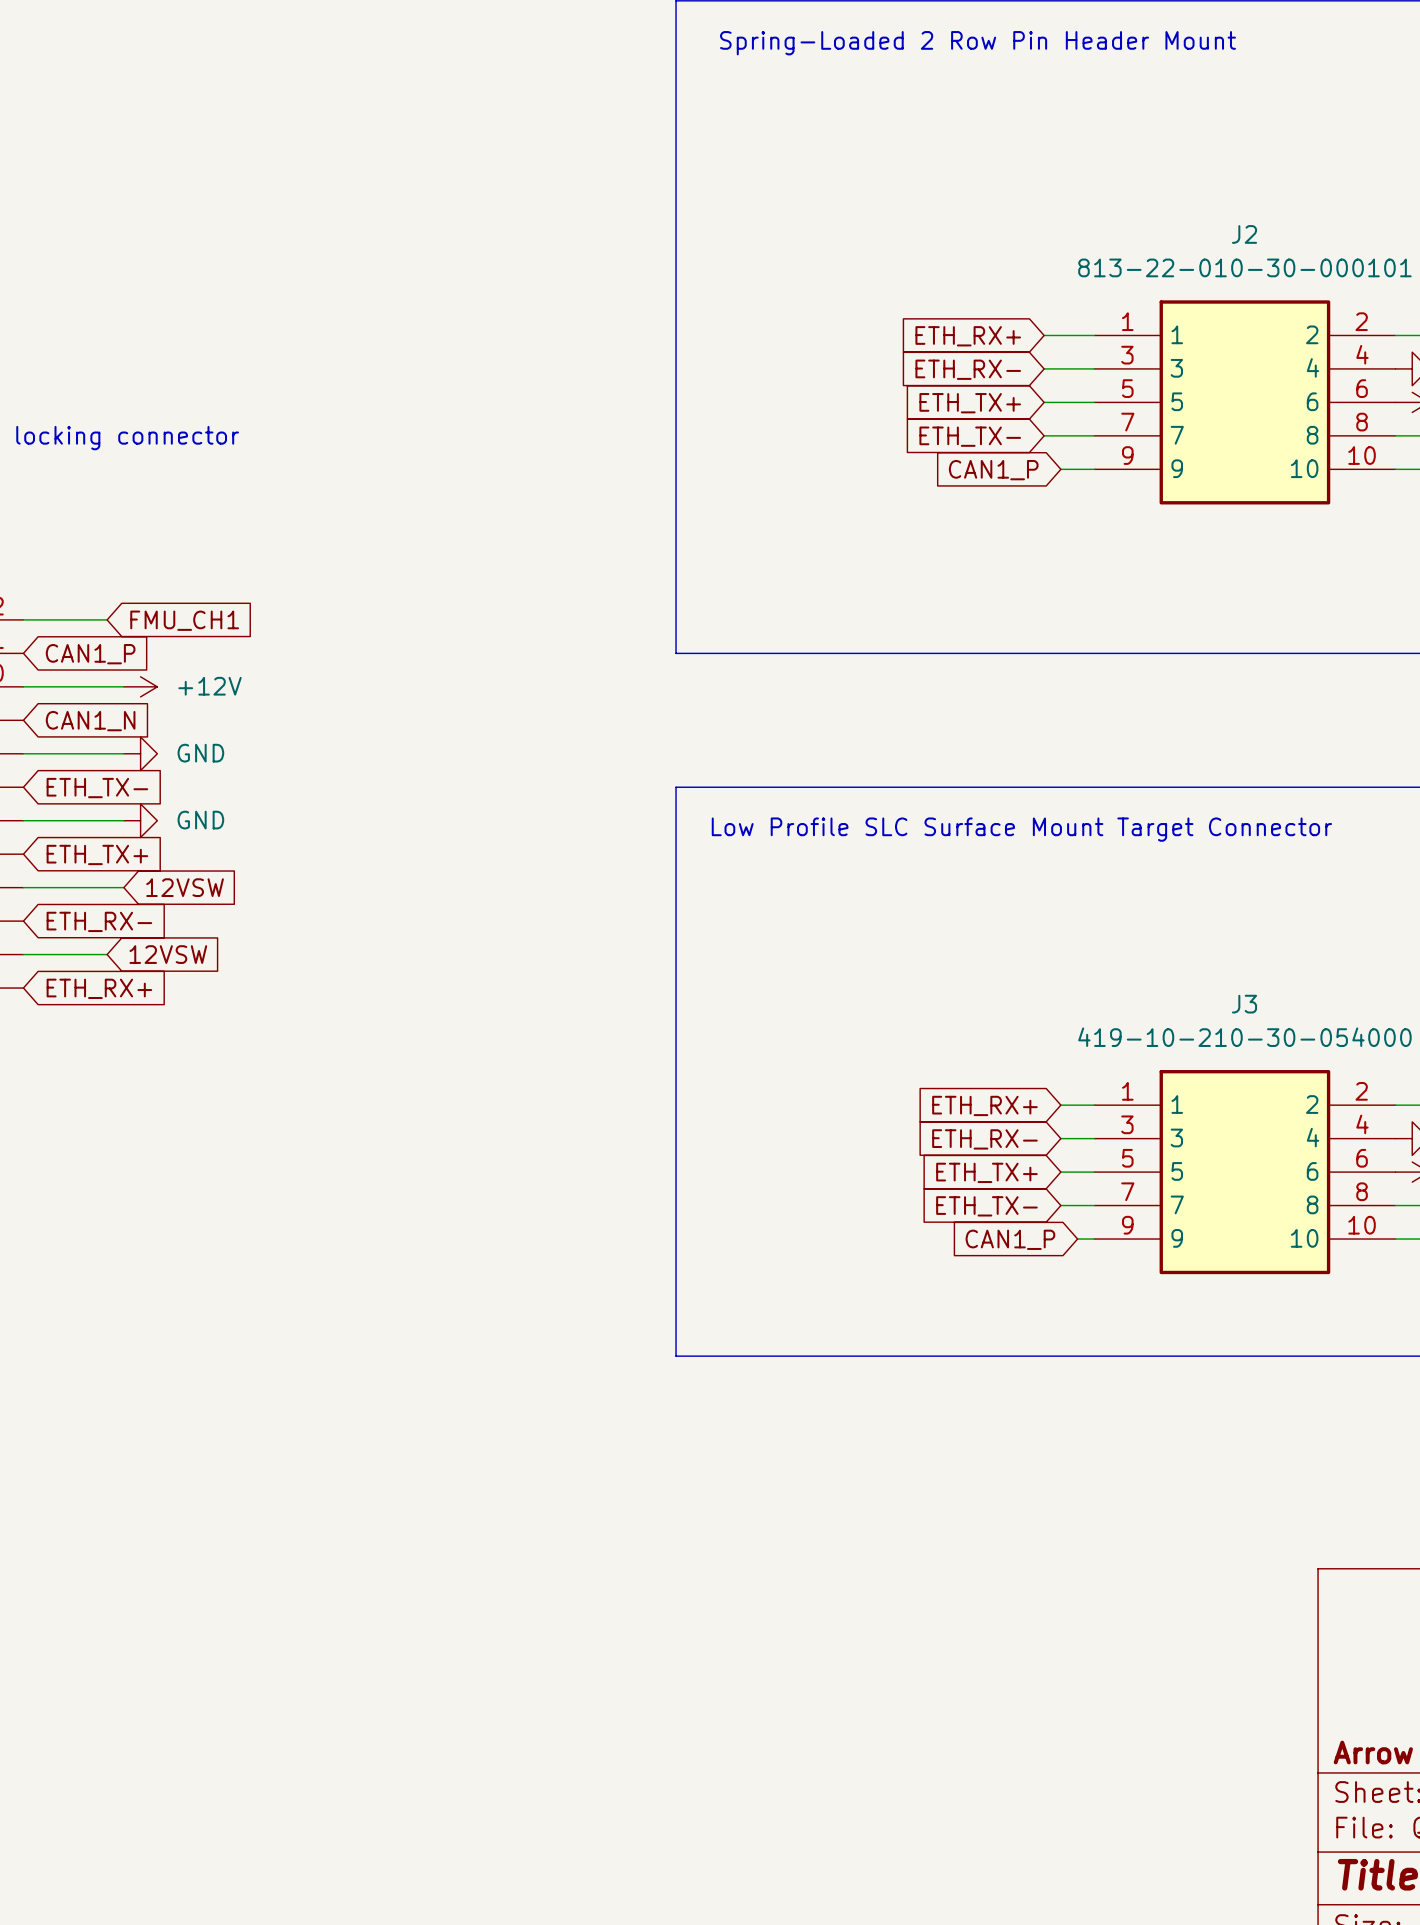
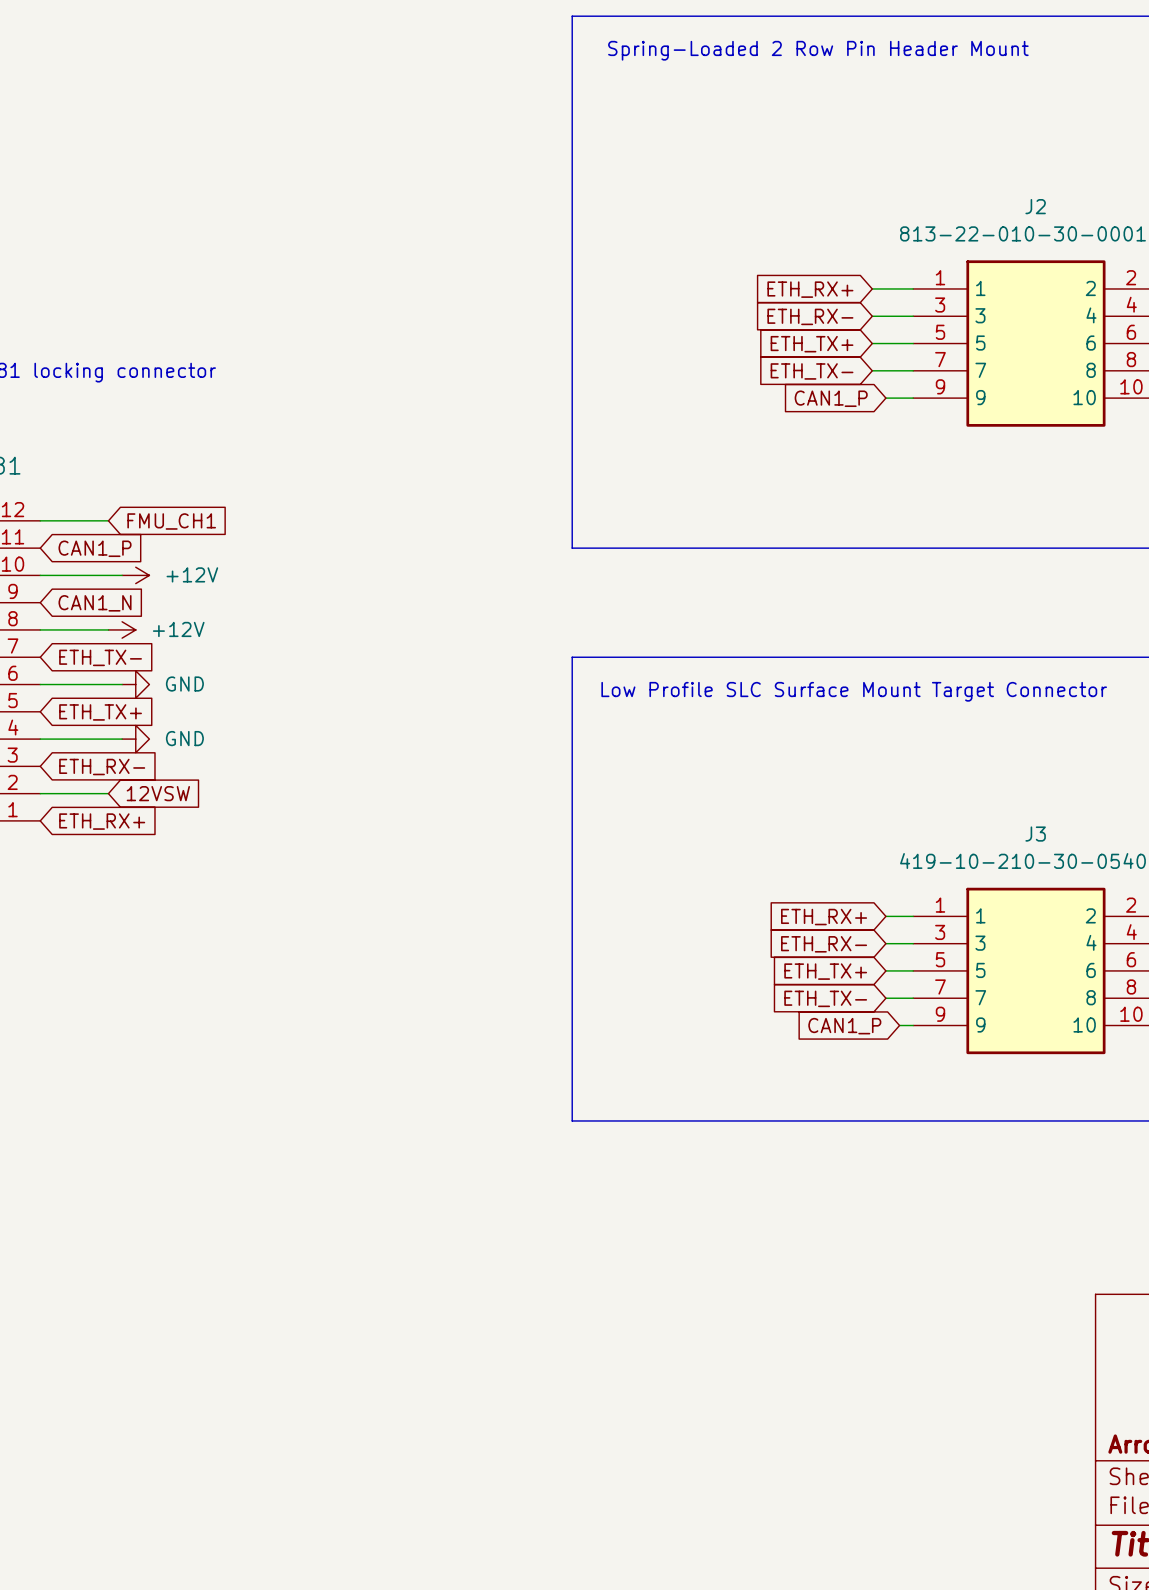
power symbol: none -> +12V (122, 629)
power symbol position: GND (140, 753) -> GND (135, 739)
global label: 12VSW (185, 887) -> none

